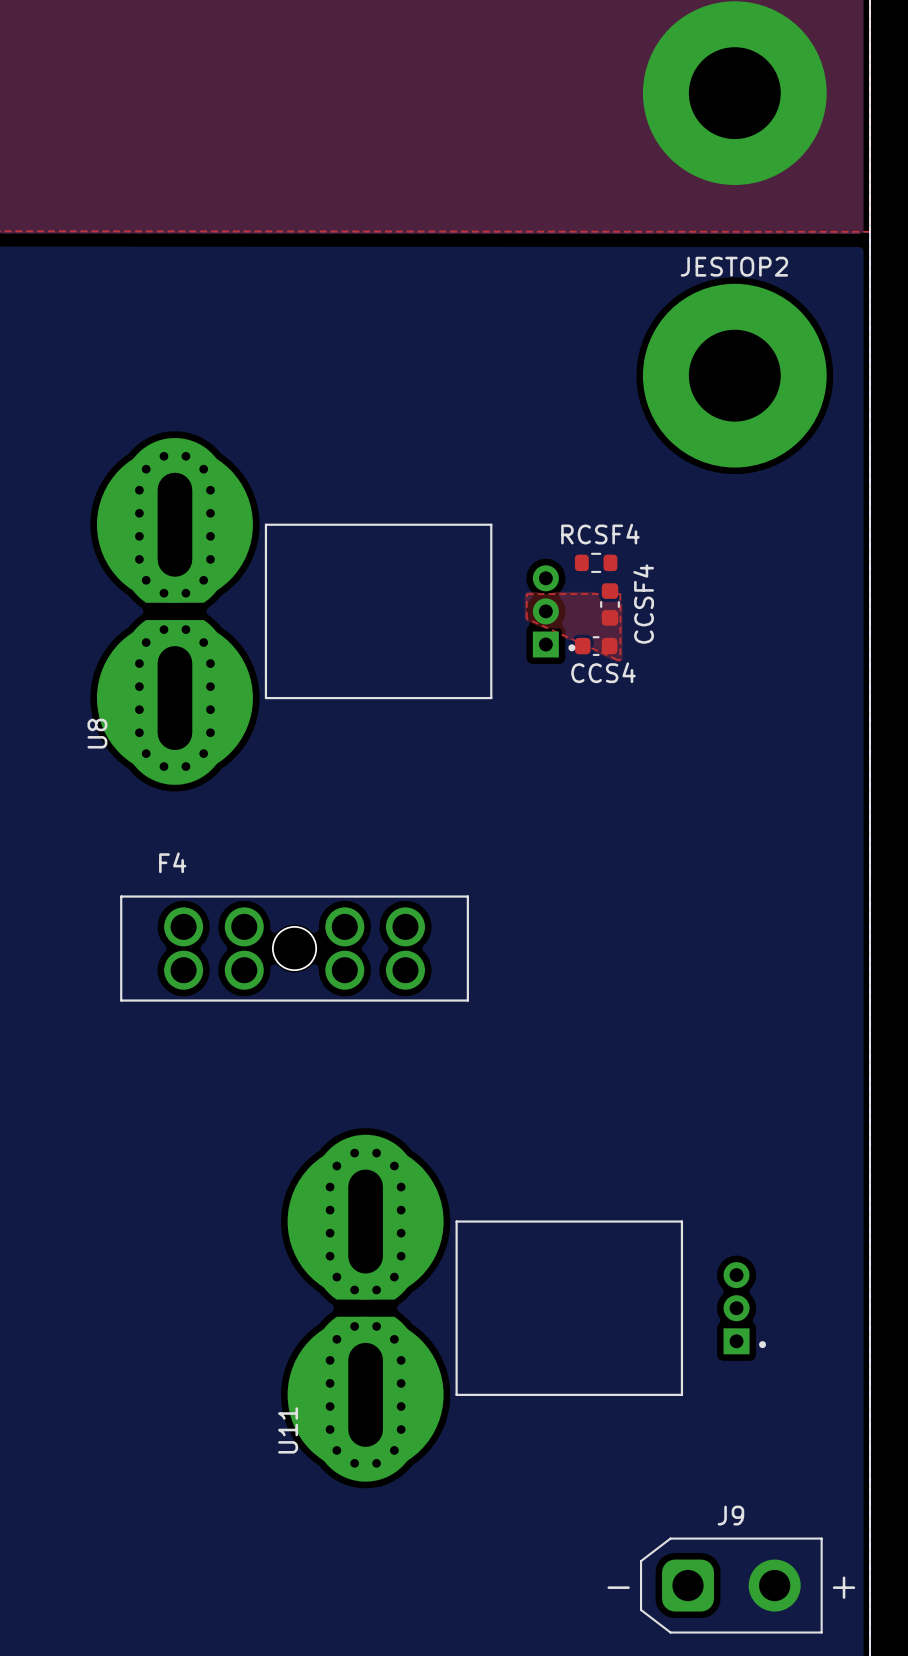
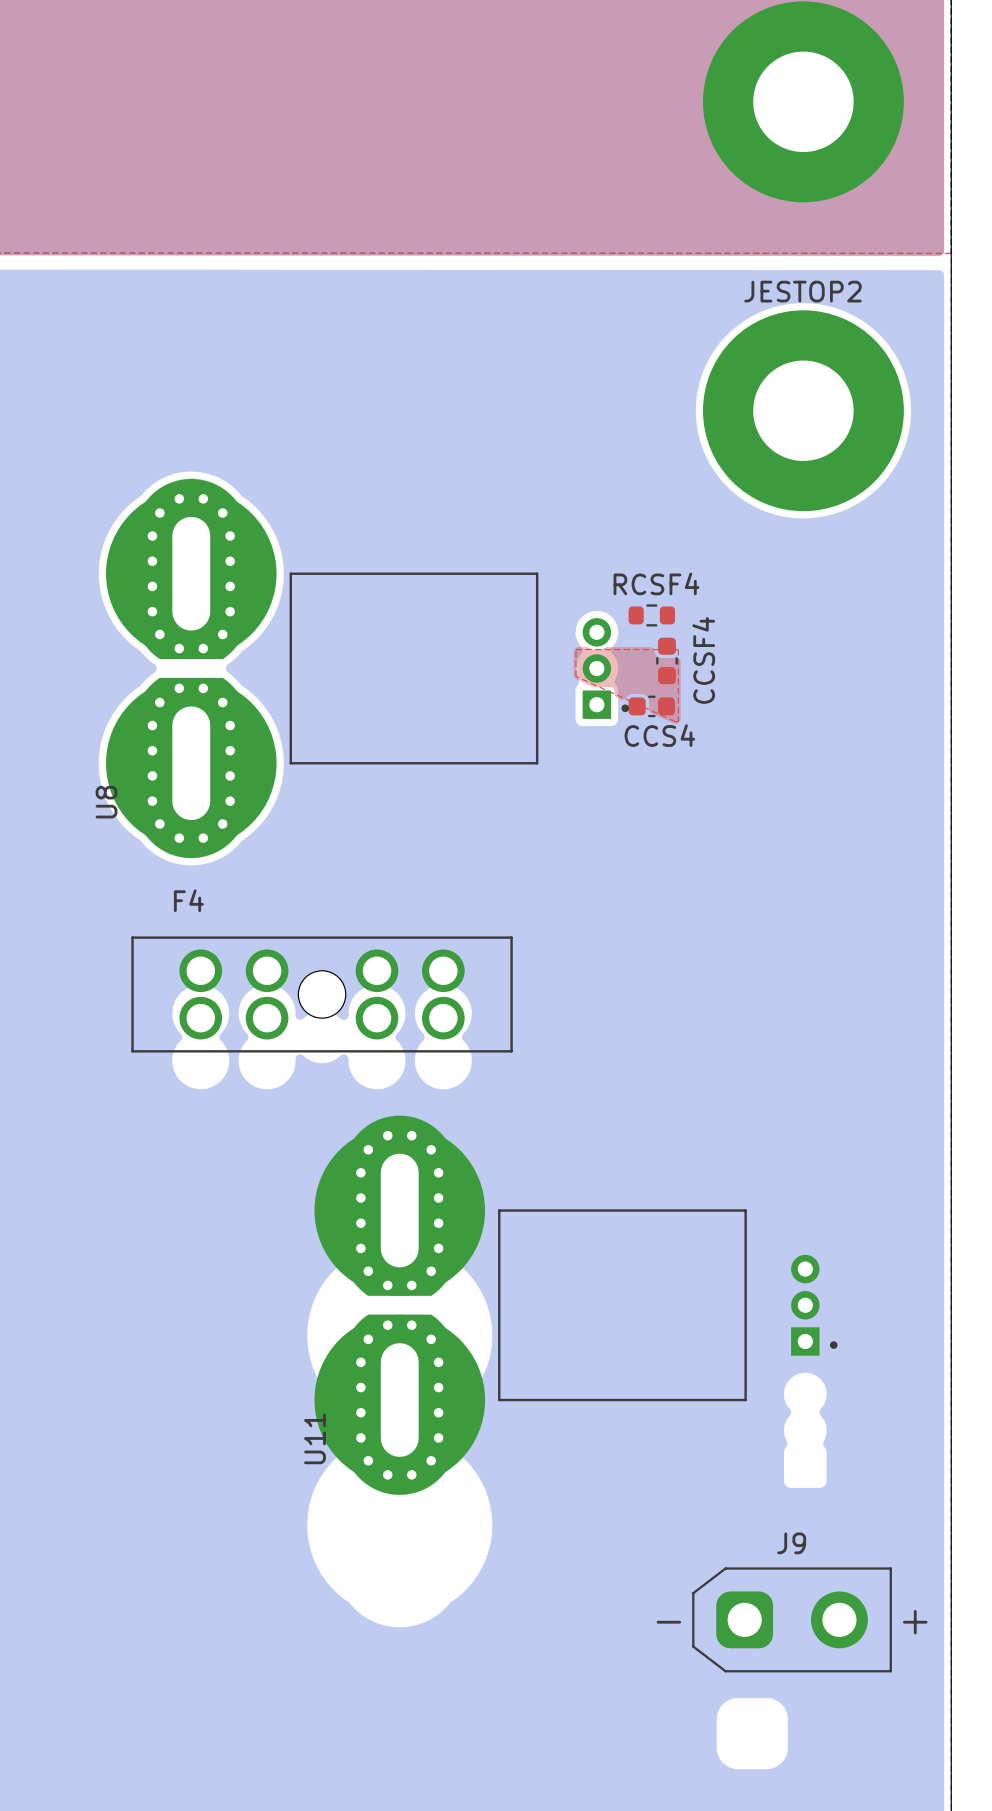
F4 position: (294, 948) -> (322, 994)
U11 position: (526, 1308) -> (576, 1305)
J9 position: (731, 1585) -> (792, 1619)

